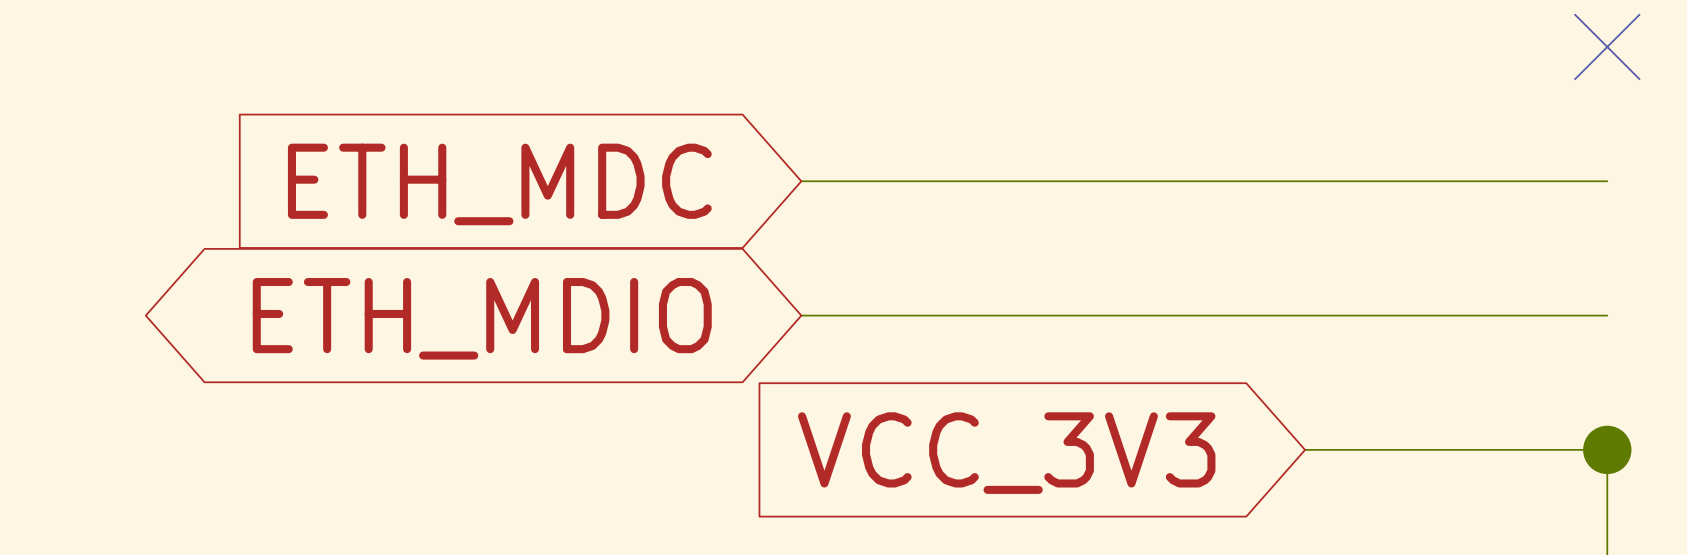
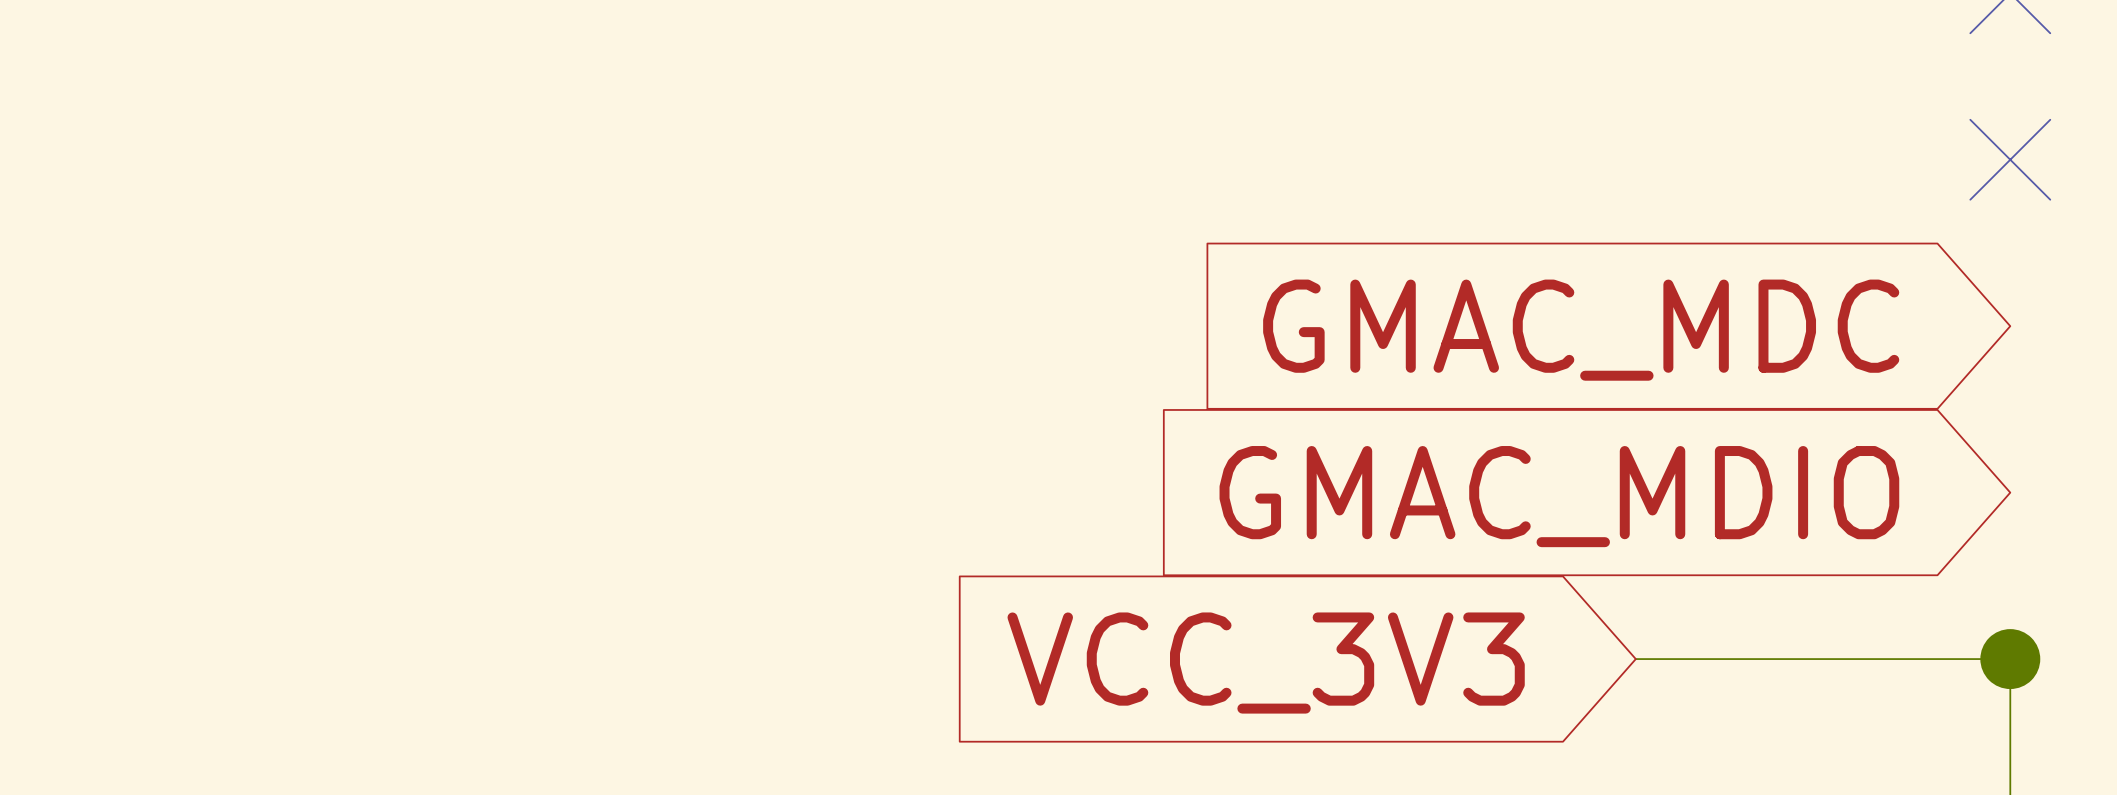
wire: (801, 181) (1607, 181) -> none
global label: ETH_MDC (499, 184) -> none
global label: none -> GMAC_MDC (1581, 330)
wire: (801, 315) (1607, 315) -> none
global label: ETH_MDIO (482, 318) -> none
global label: none -> GMAC_MDIO (1559, 496)

